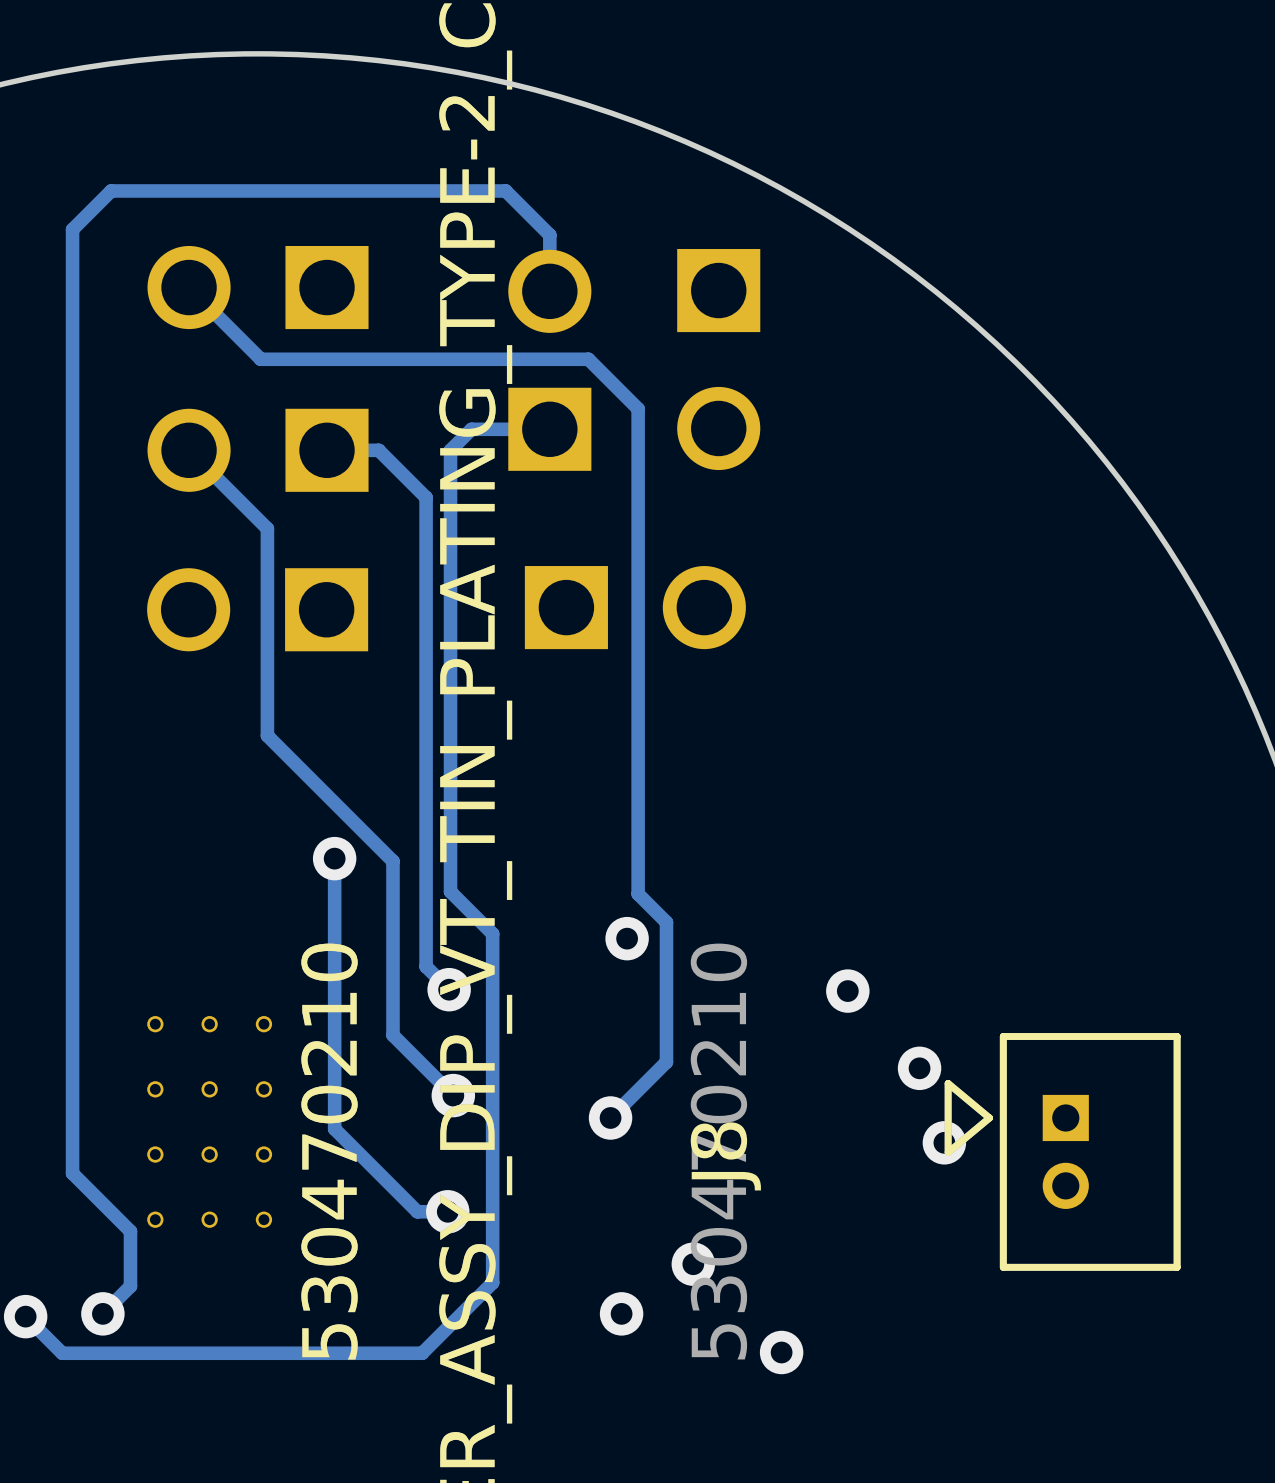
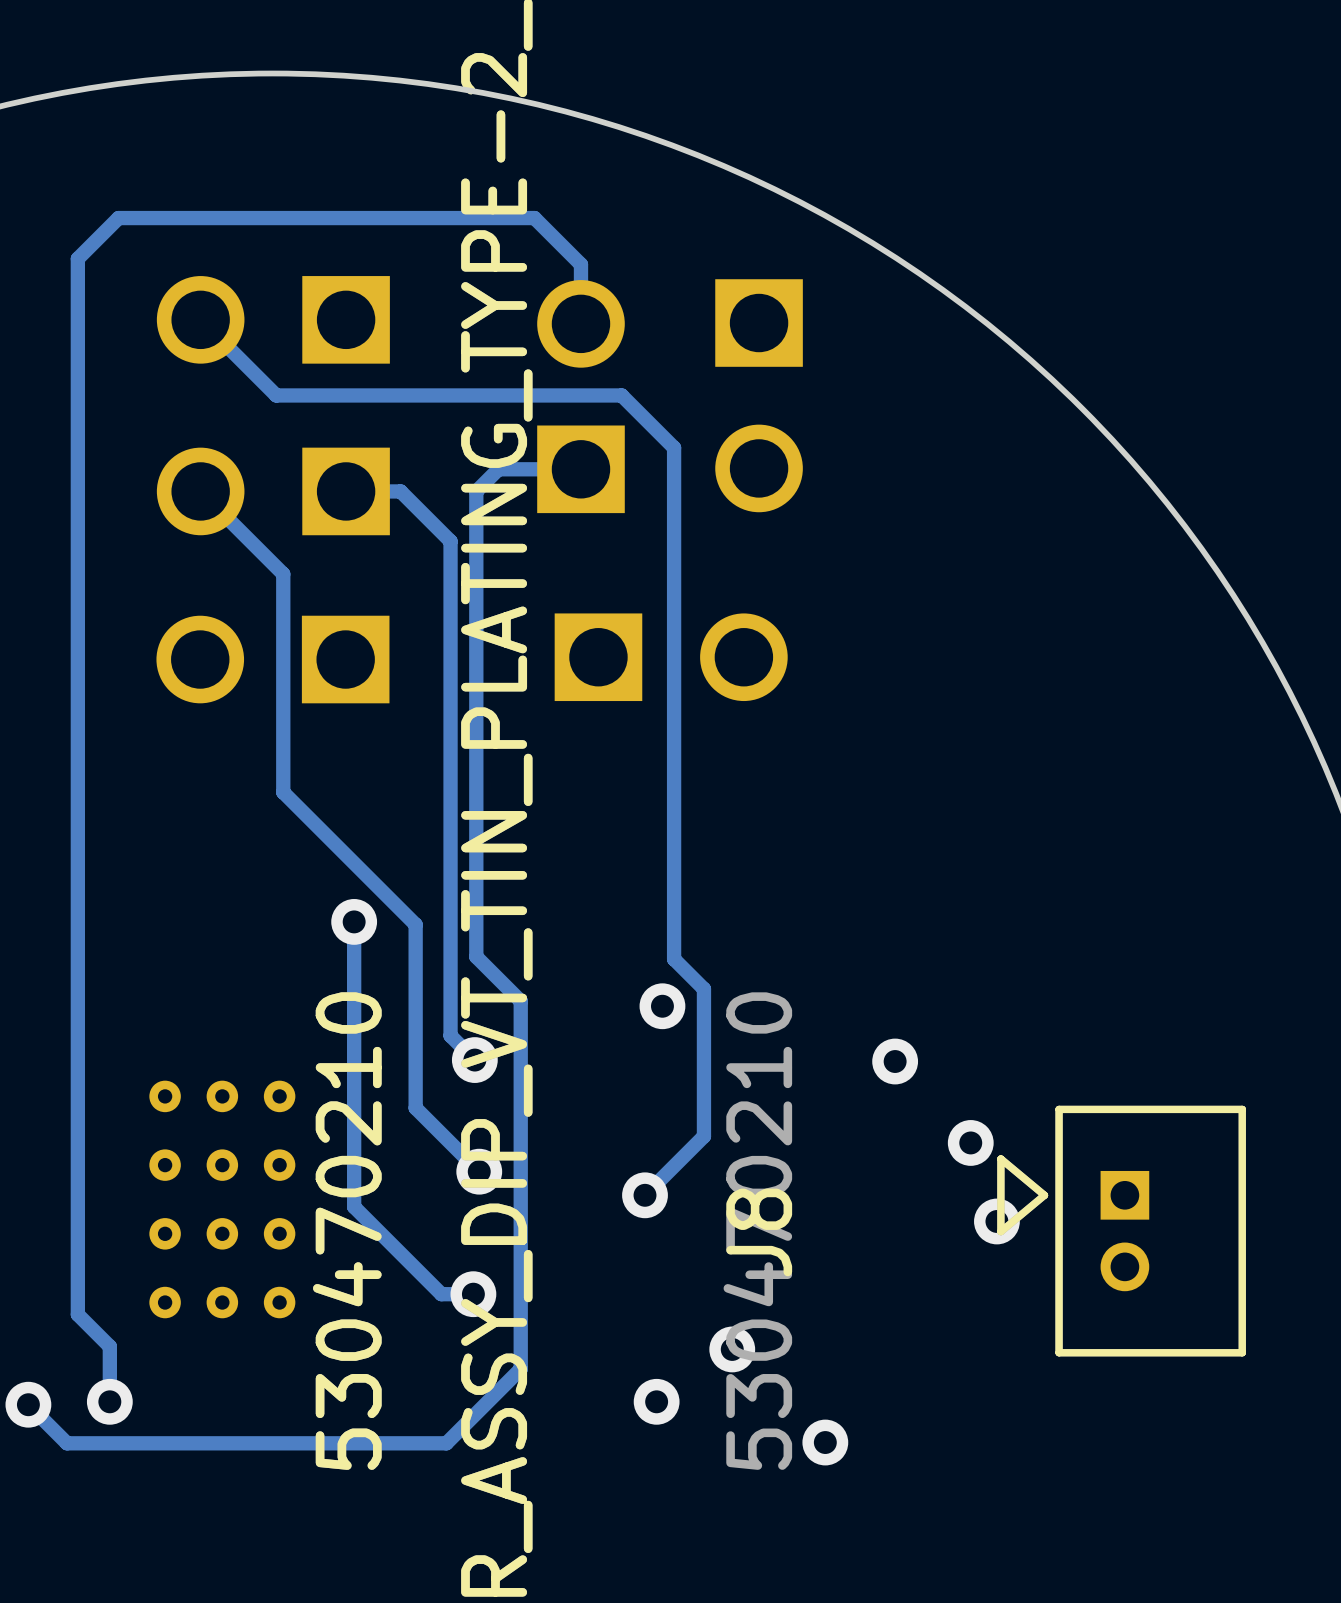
part footprint: [147, 1016, 273, 1228] -> [149, 1080, 296, 1319]
track: (72, 1173) (130, 1231) (130, 1286) (102, 1313) -> (77, 1253) (77, 1314) (109, 1346) (109, 1401)

